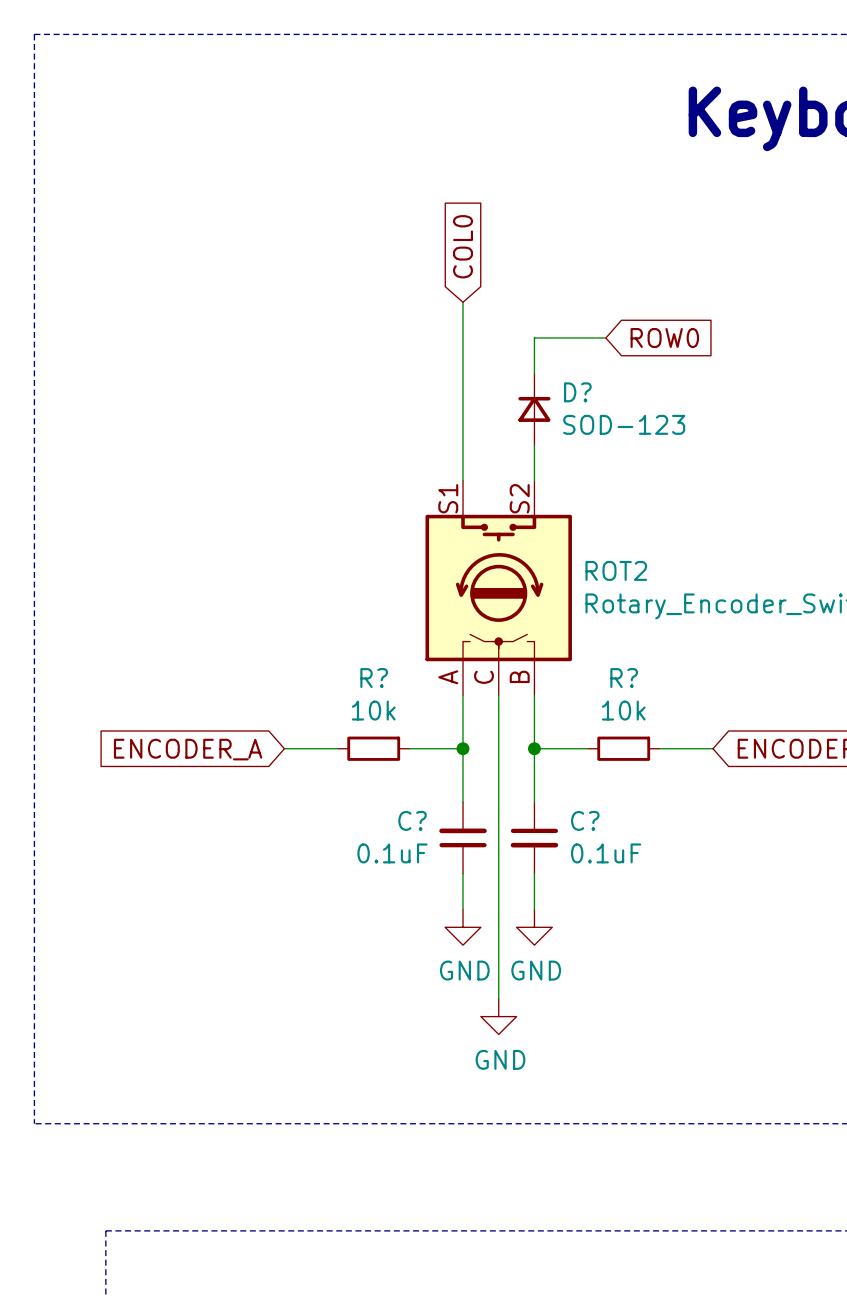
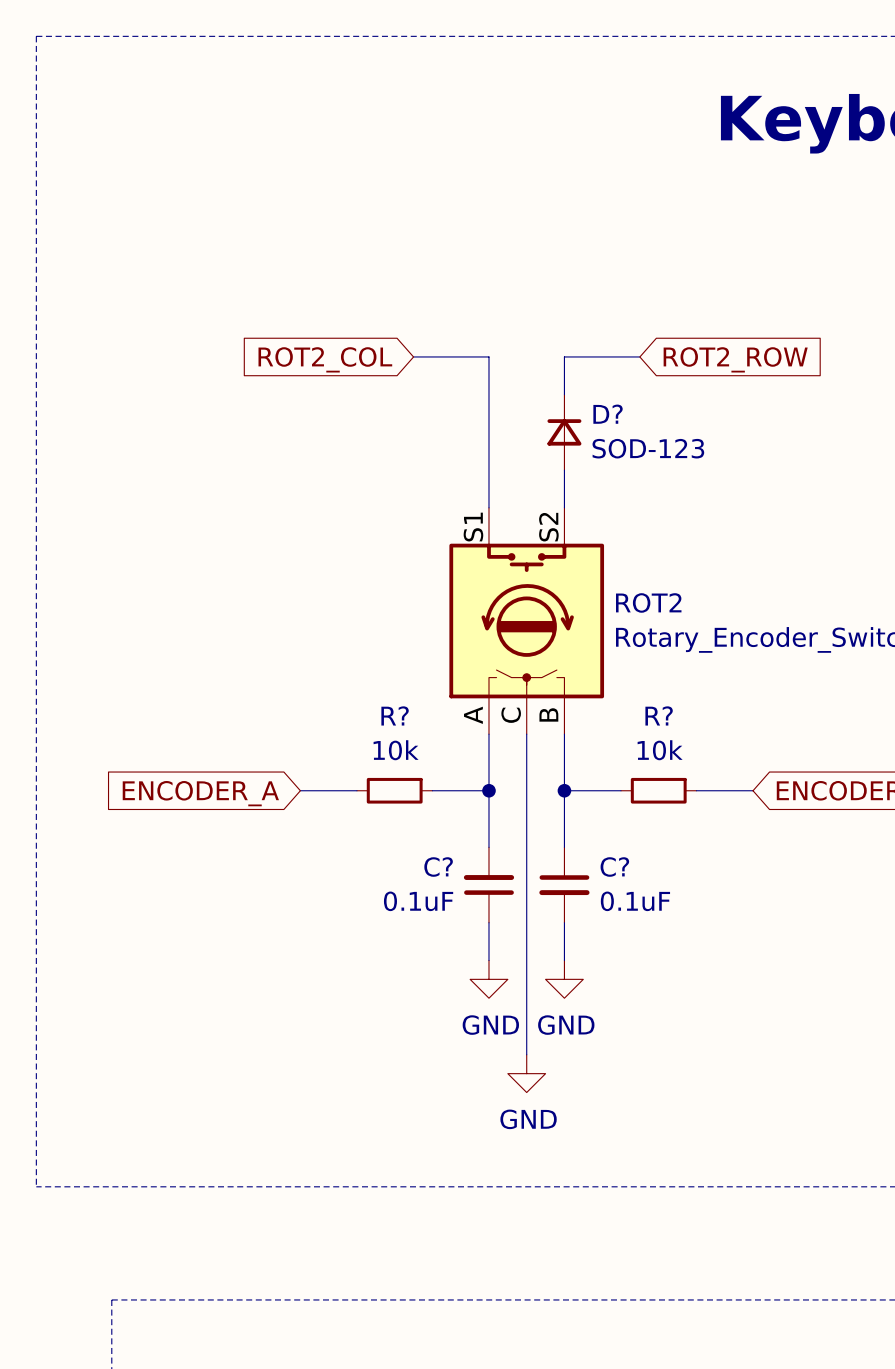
global label: COL0 (463, 246) -> none
wire: (463, 302) (463, 338) -> (413, 356) (488, 356)
global label: none -> ROT2_COL (325, 359)
global label: ROW0 (664, 338) -> ROT2_ROW (735, 359)

